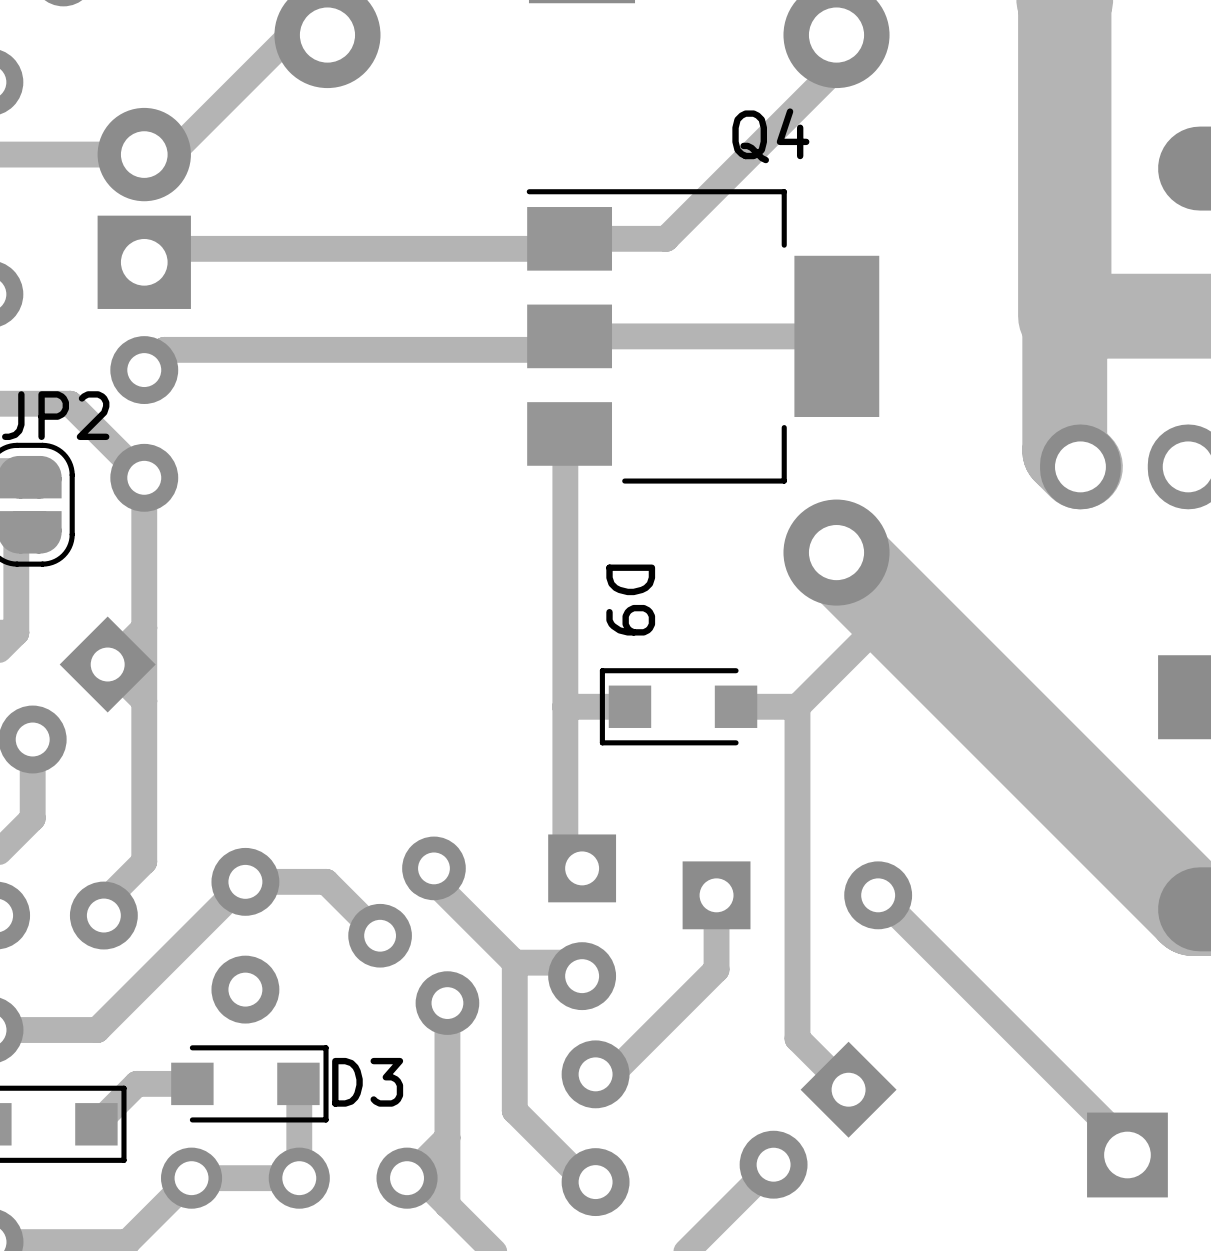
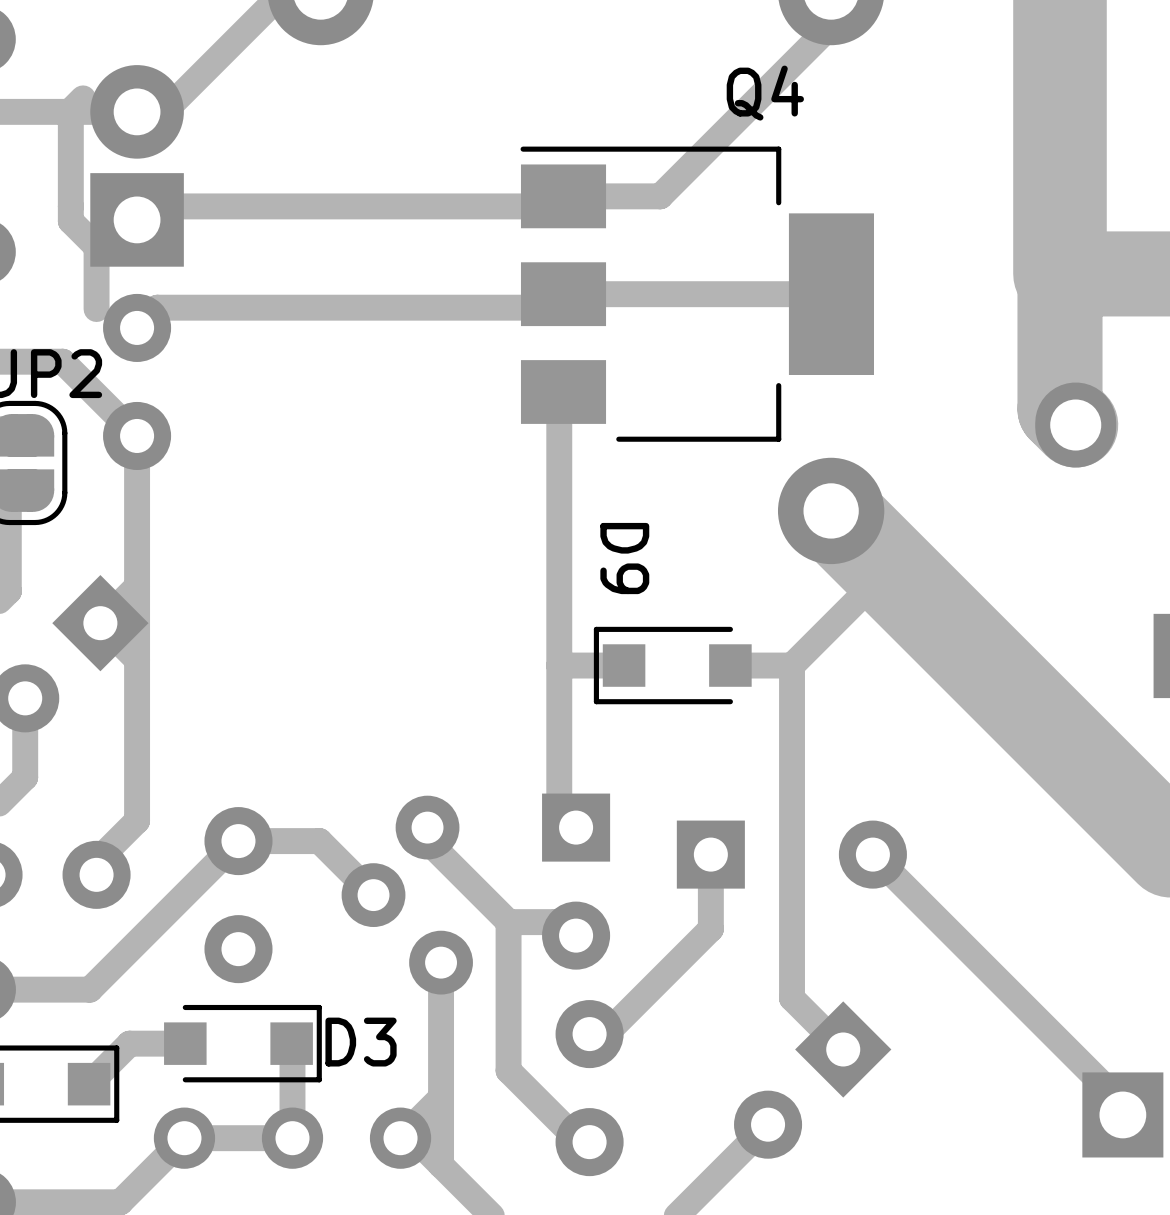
track: none -> (83, 98) (70, 110) (70, 221) (96, 246) (96, 309)

